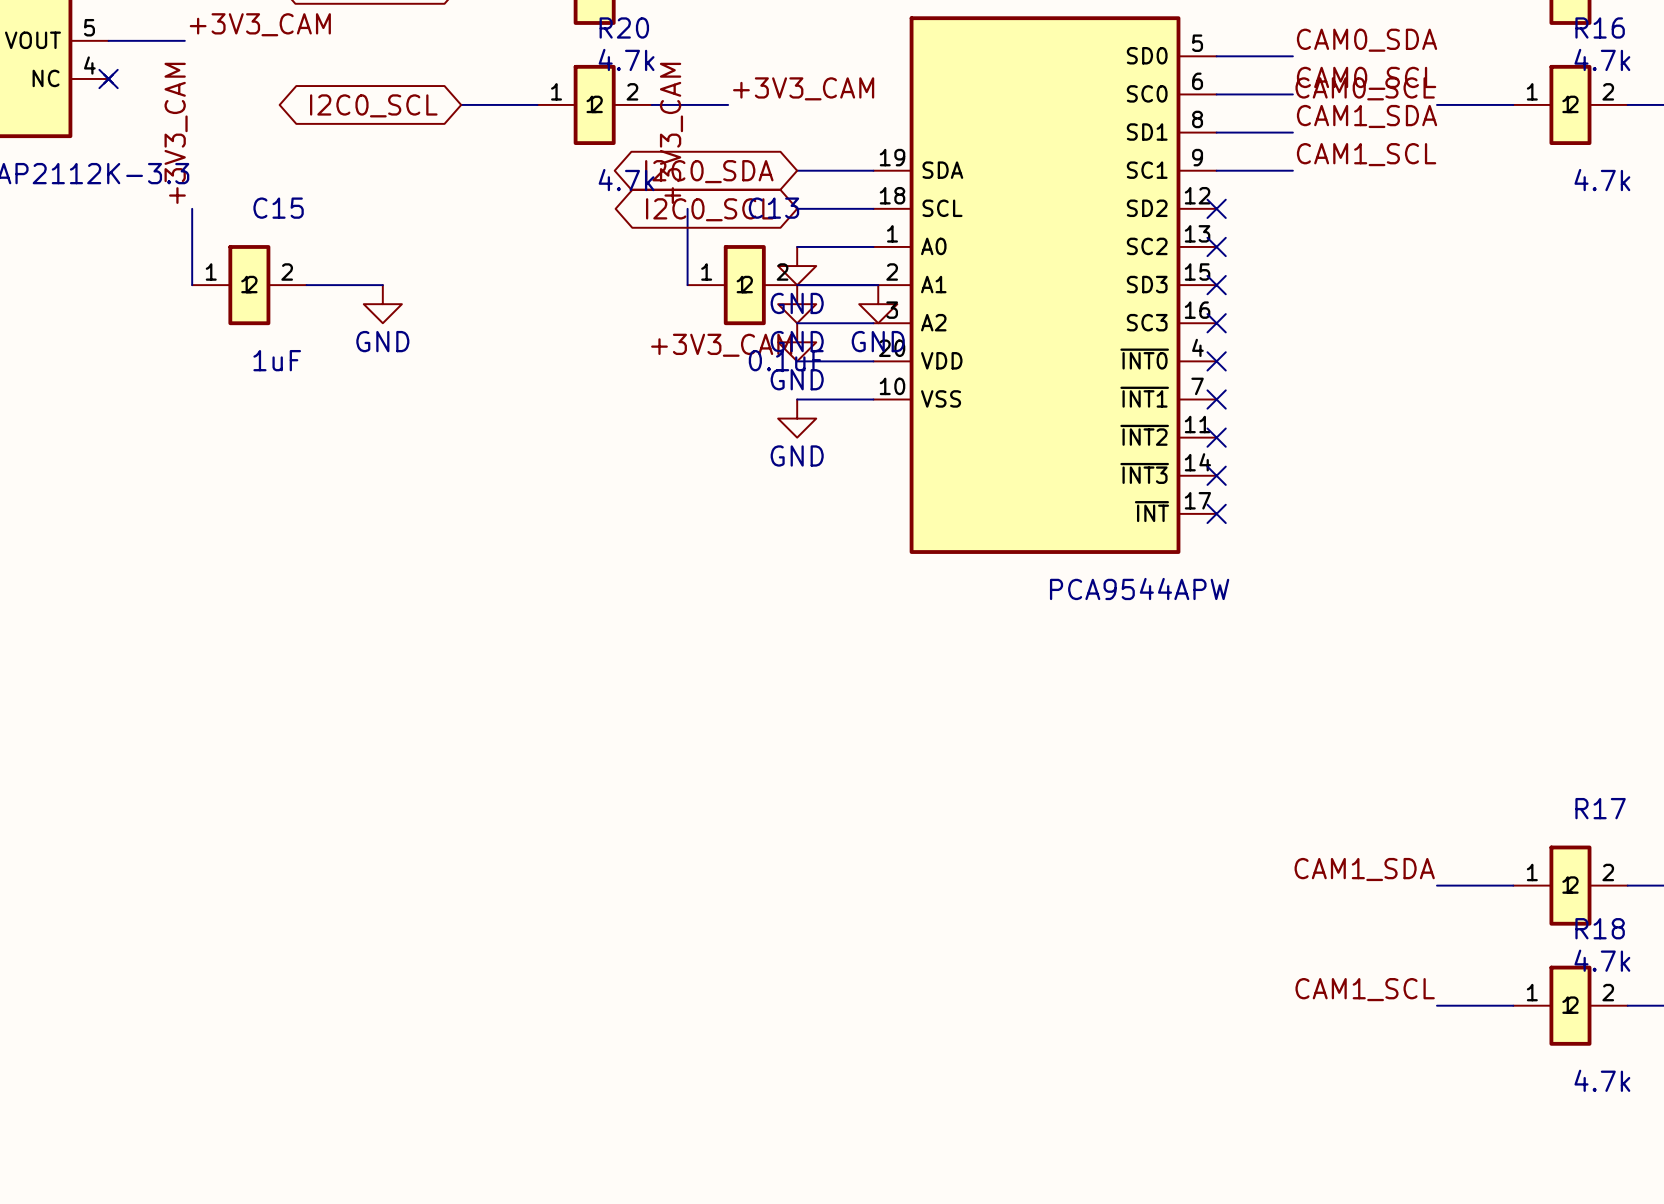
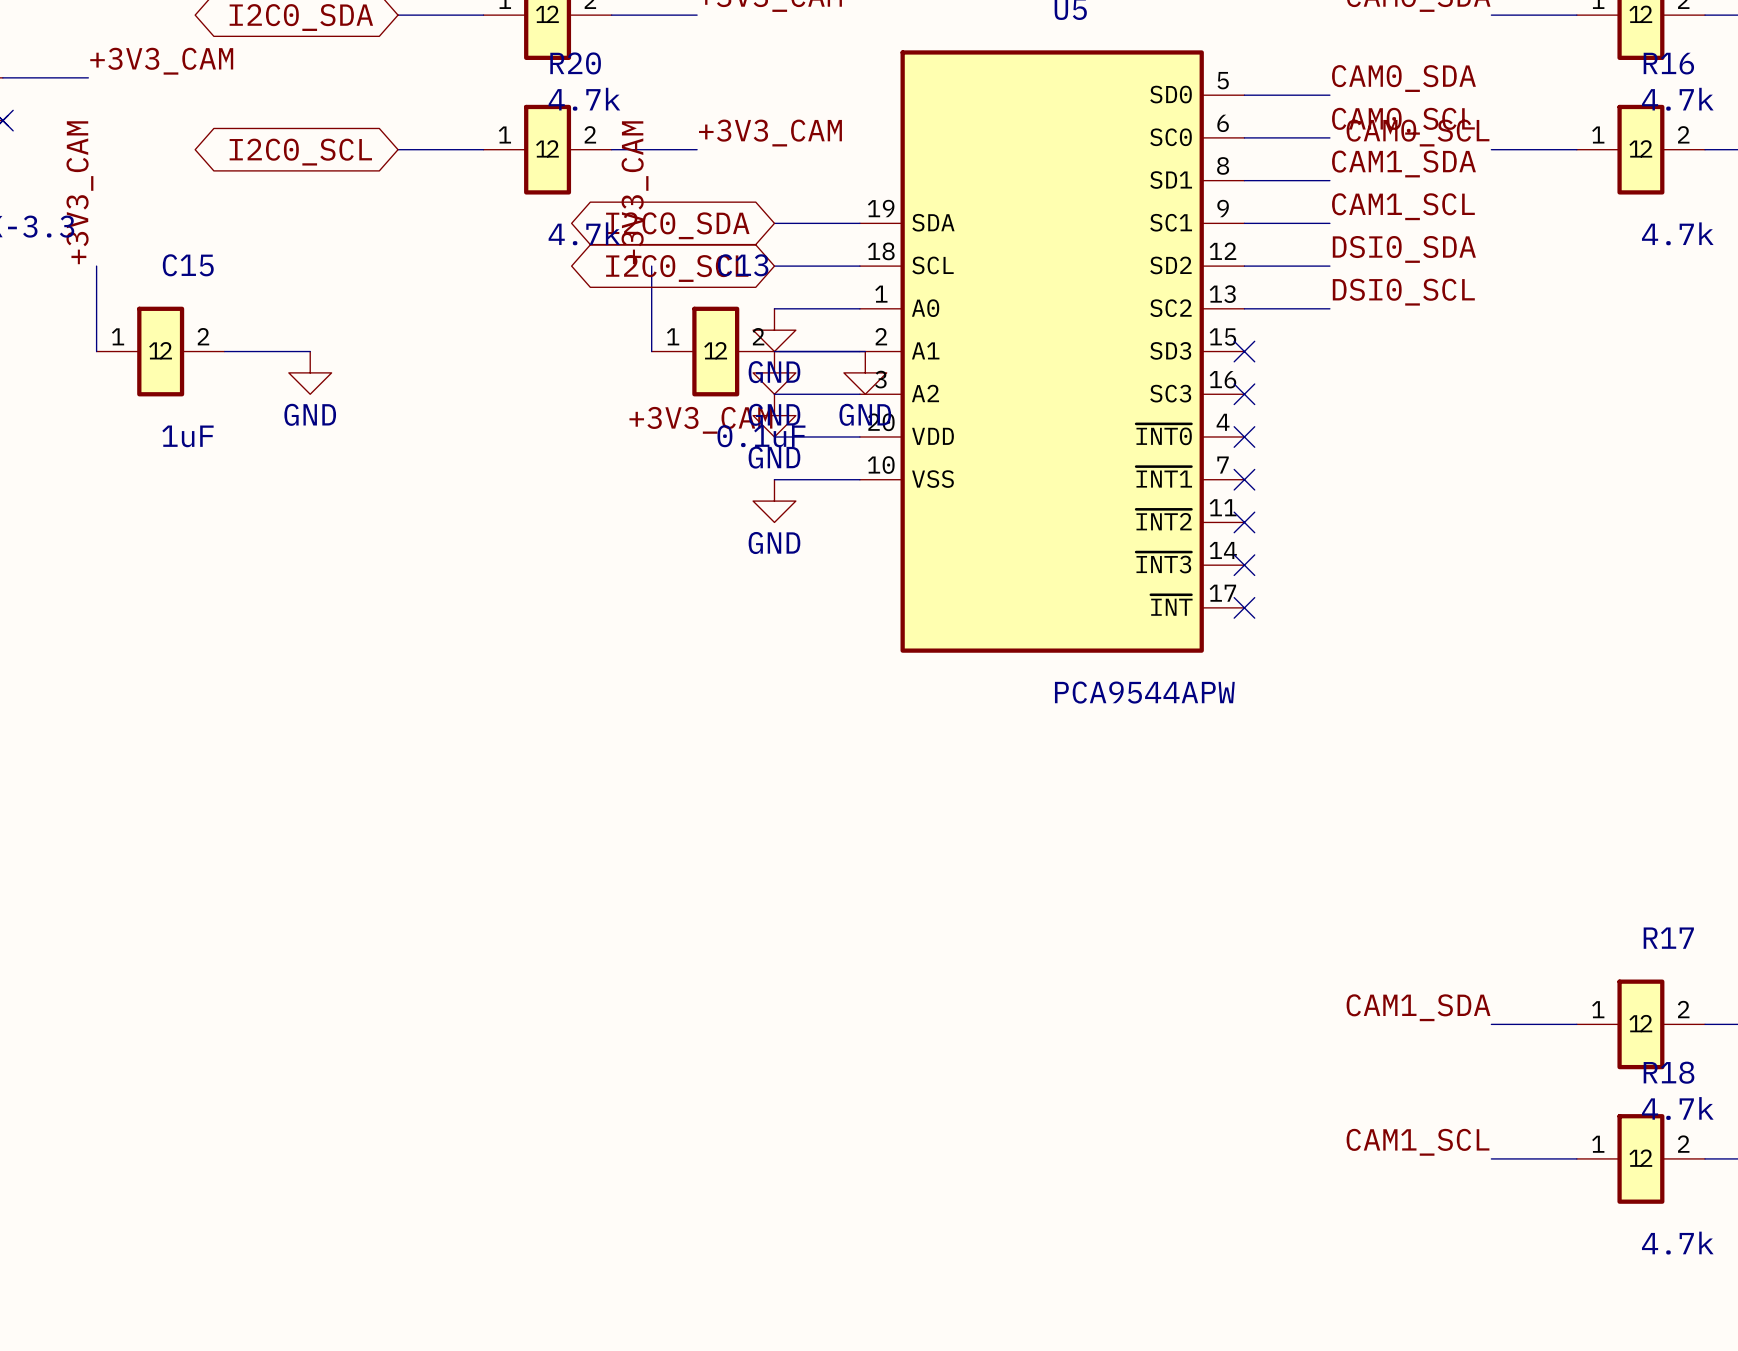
label: none -> DSI0_SDA (1404, 249)
wire: none -> (1244, 266) (1329, 266)
no-connect mark: (1216, 208) -> none
label: none -> DSI0_SCL (1403, 292)
wire: none -> (1244, 308) (1329, 308)
no-connect mark: (1216, 246) -> none

